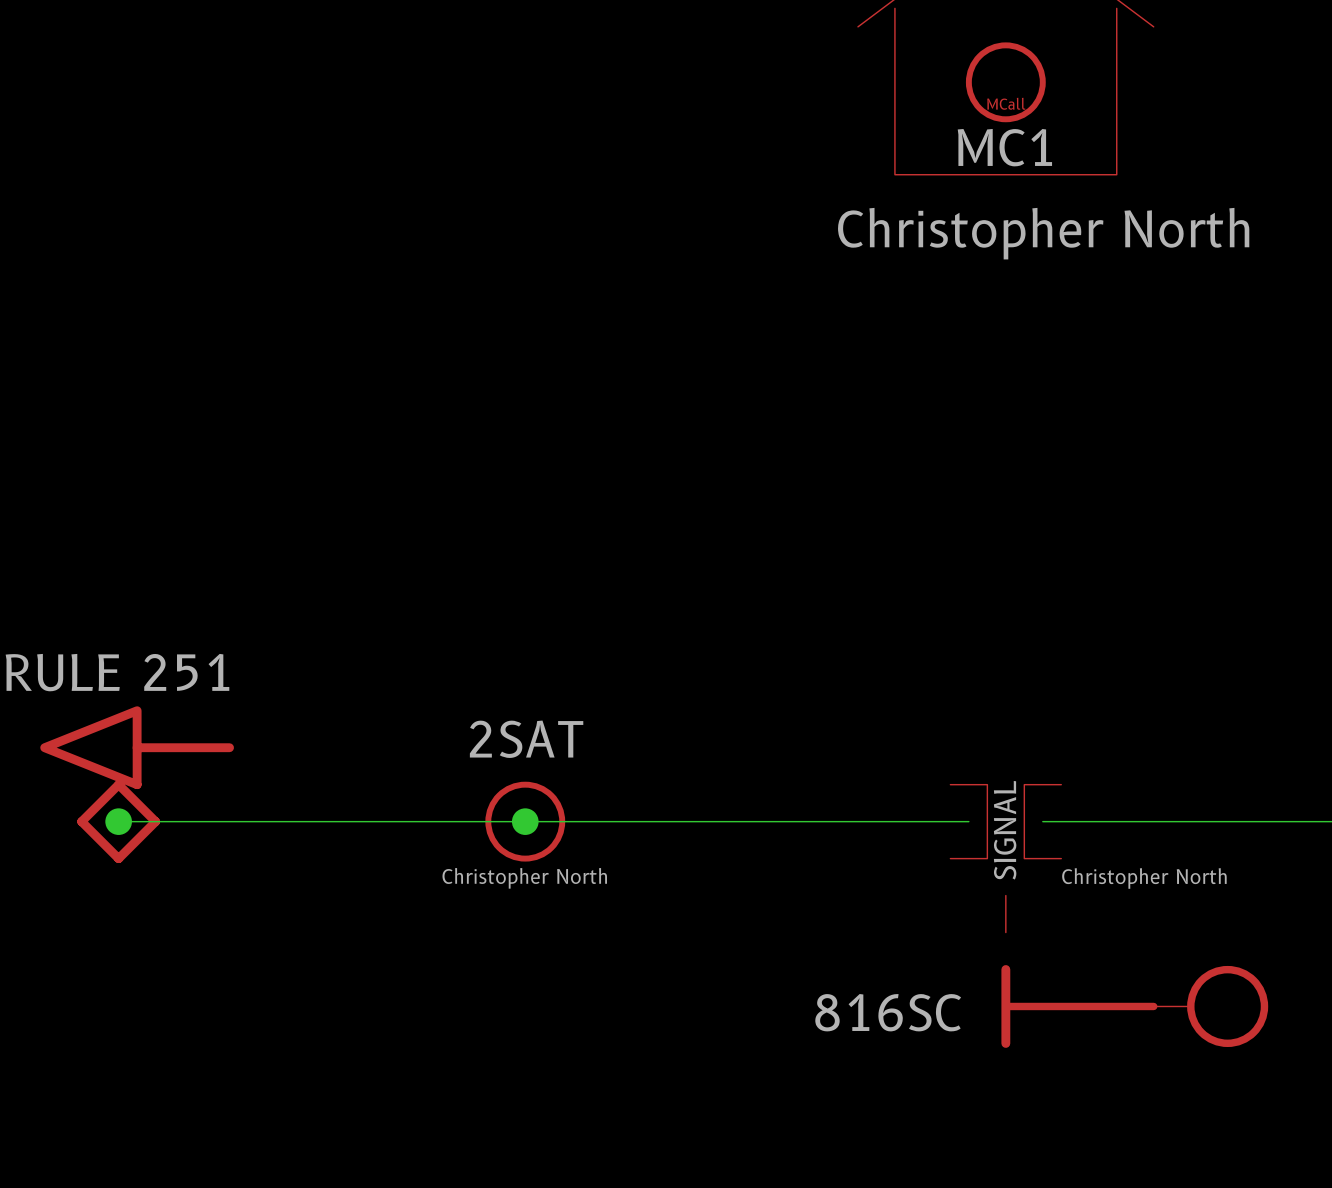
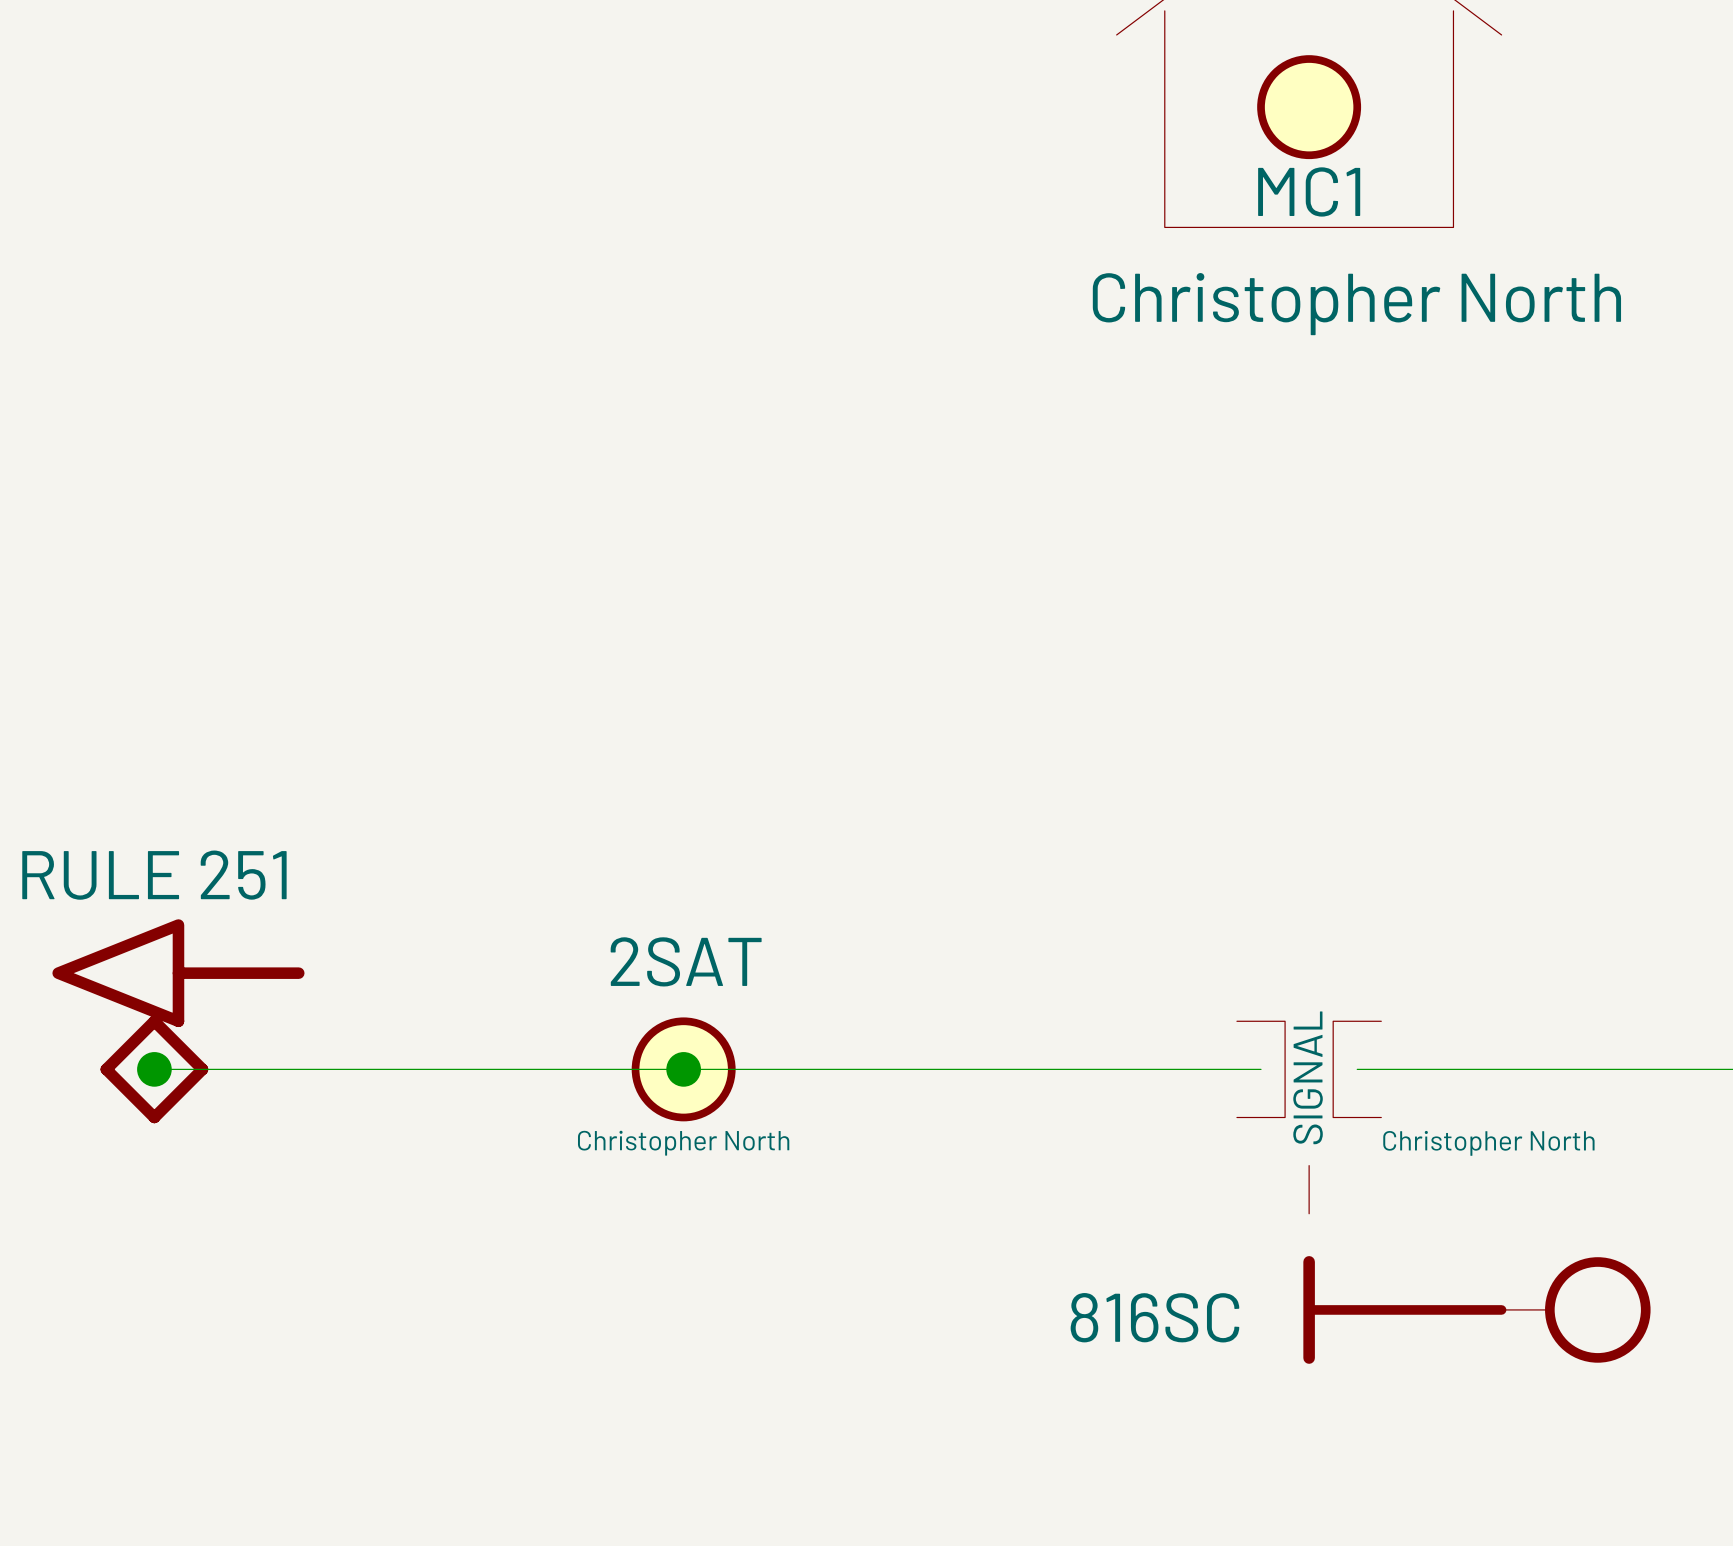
part text: MCall (1006, 103) -> none

